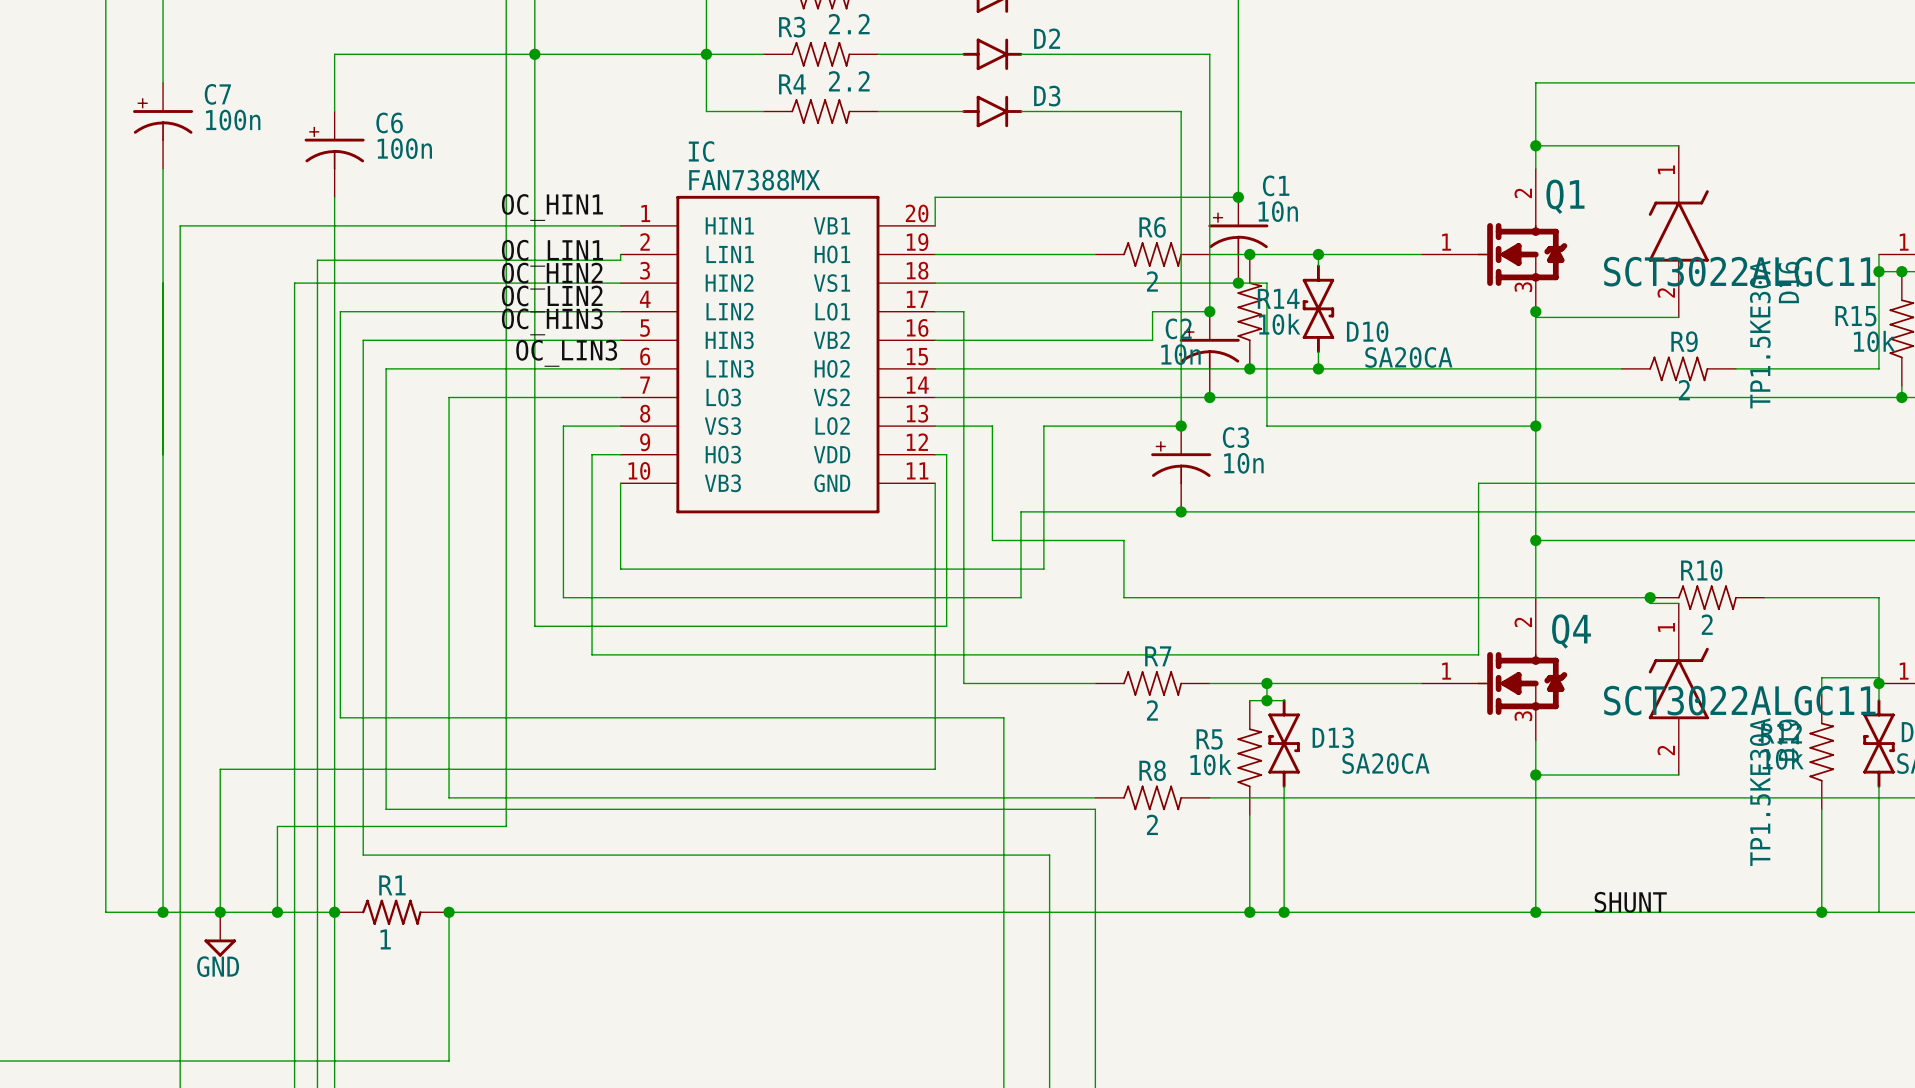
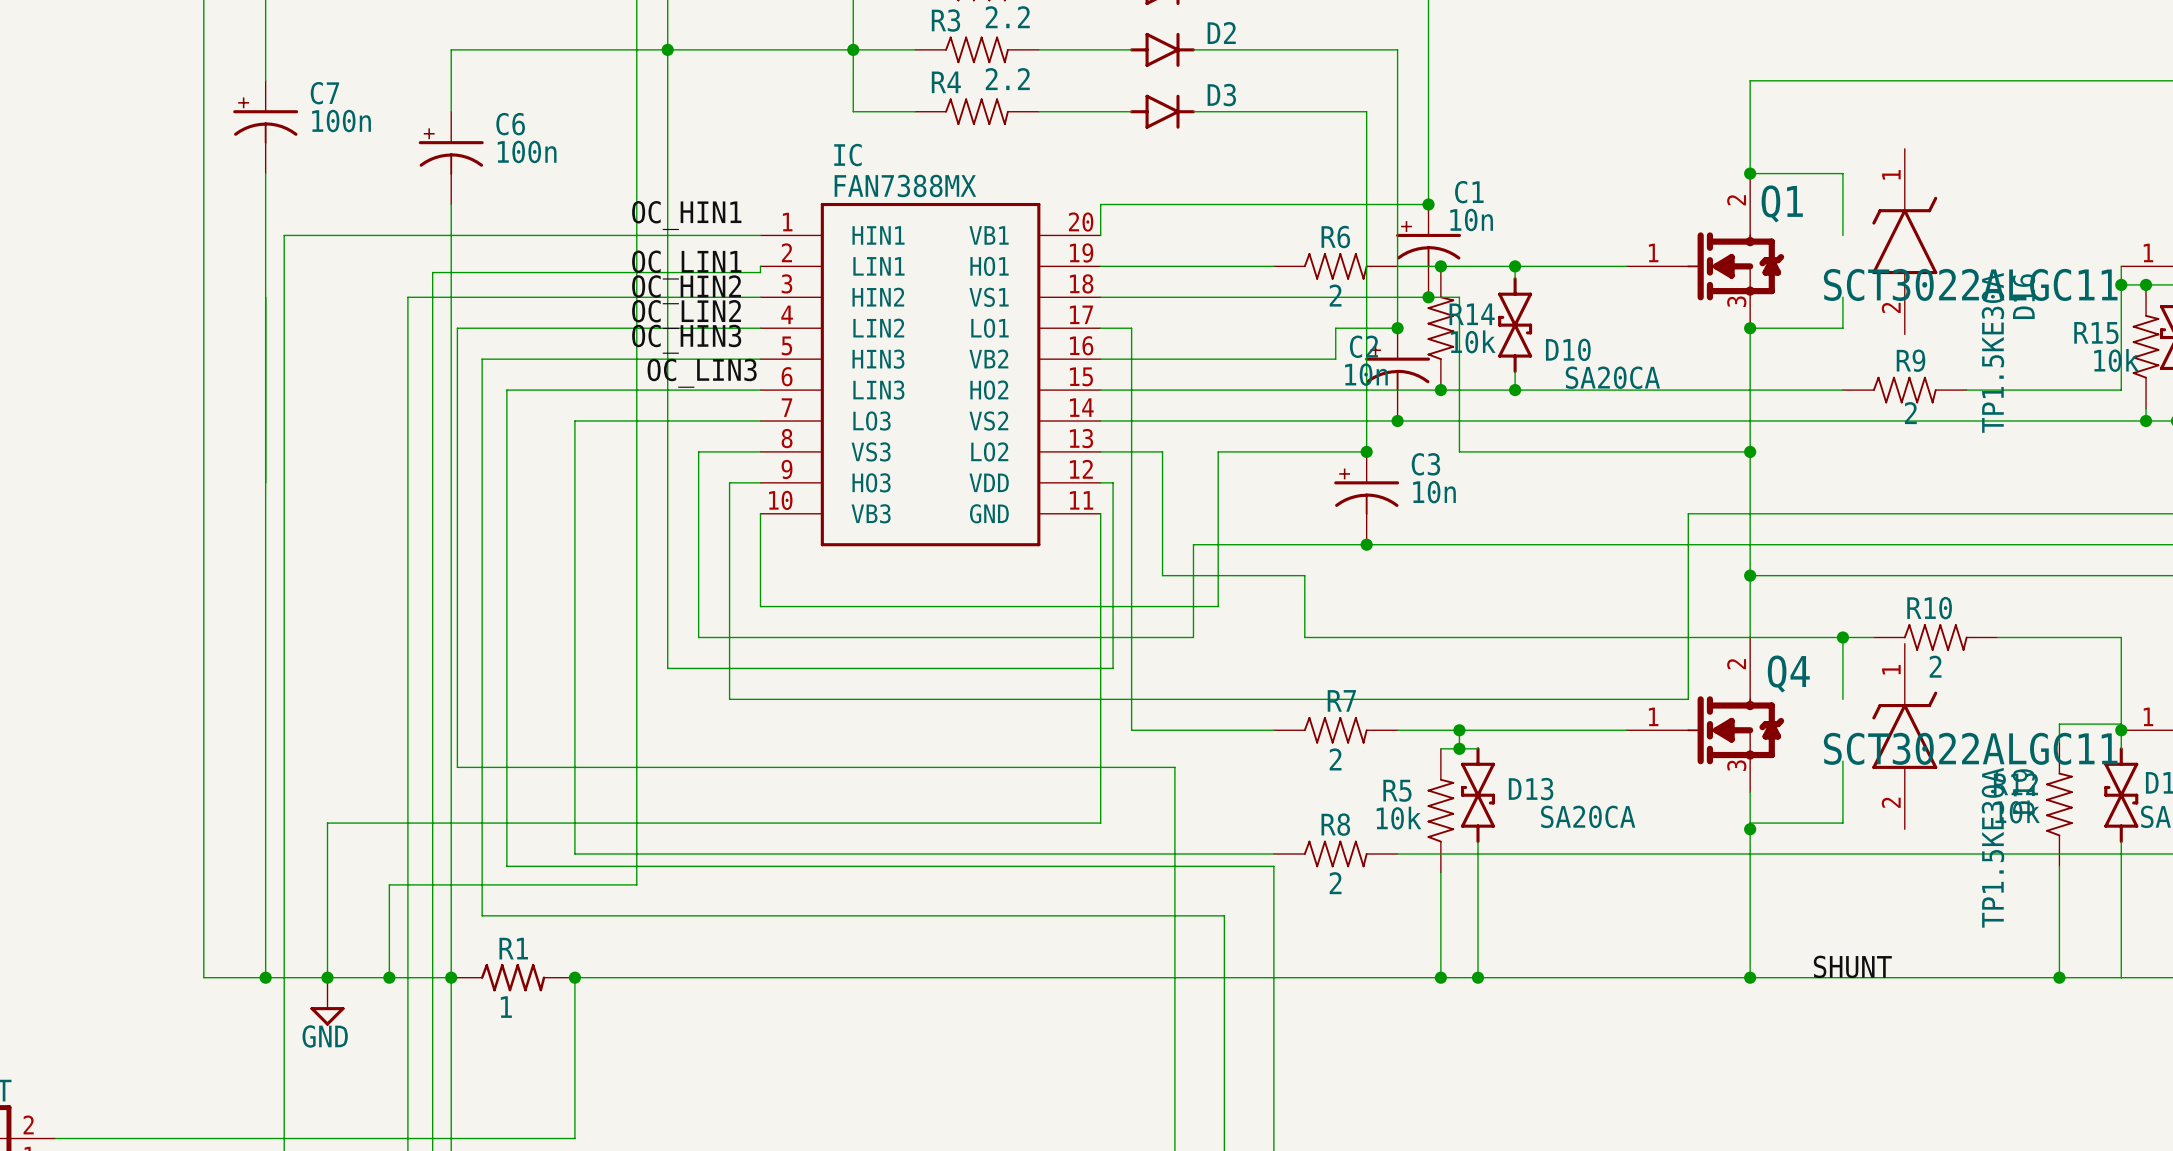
wire: (1535, 145) (1678, 145) -> none
junction position: (1535, 145) -> (1750, 173)
wire: none -> (1750, 173) (1842, 173) (1842, 235)
wire: none -> (1842, 297) (1842, 328) (1750, 328)
wire: (1535, 317) (1678, 317) -> none
wire: none -> (1842, 637) (1842, 699)
wire: (1650, 597) (1650, 603) (1678, 603) -> none
junction position: (1650, 597) -> (1842, 637)
wire: none -> (1842, 761) (1842, 823) (1750, 823)
wire: (1535, 775) (1678, 775) -> none

